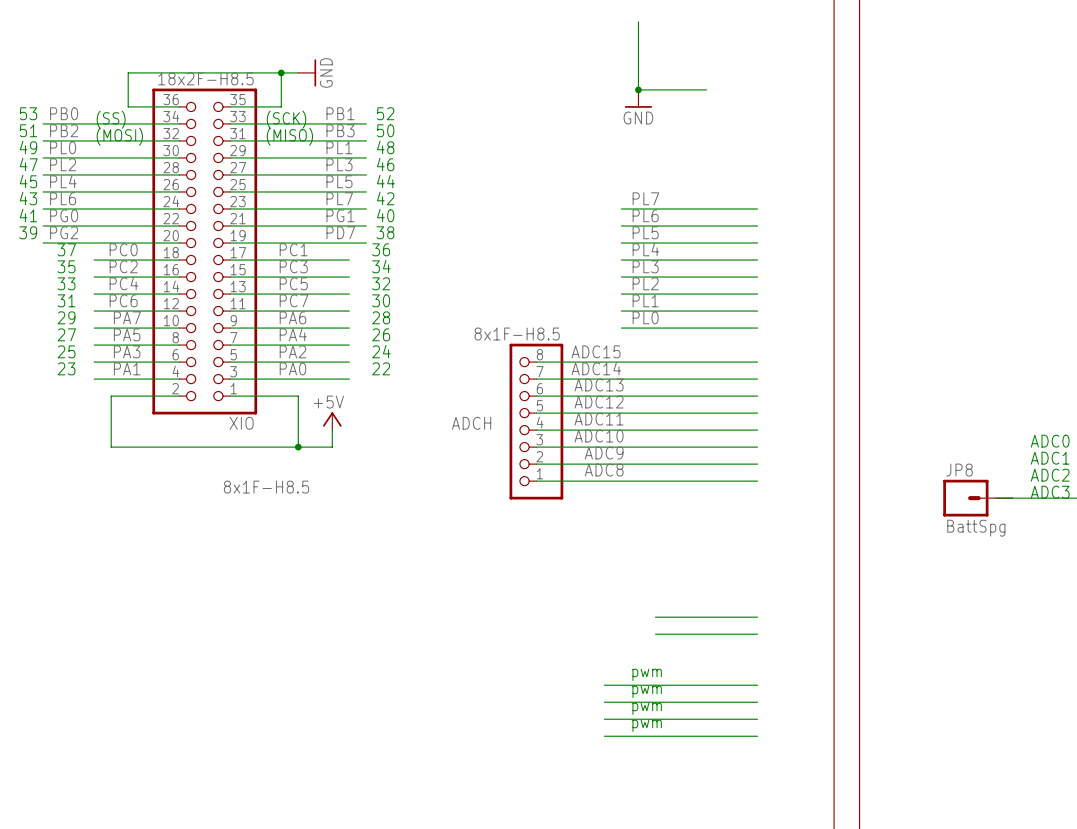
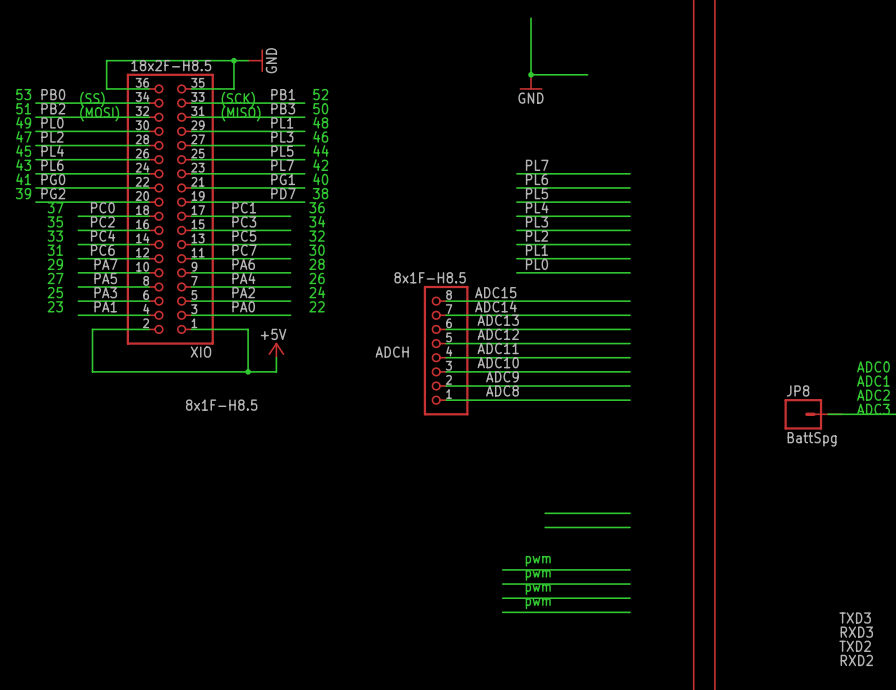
label: none -> TXD3 (855, 618)
label: none -> RXD3 (856, 632)
label: none -> TXD2 (855, 646)
label: none -> RXD2 (856, 660)

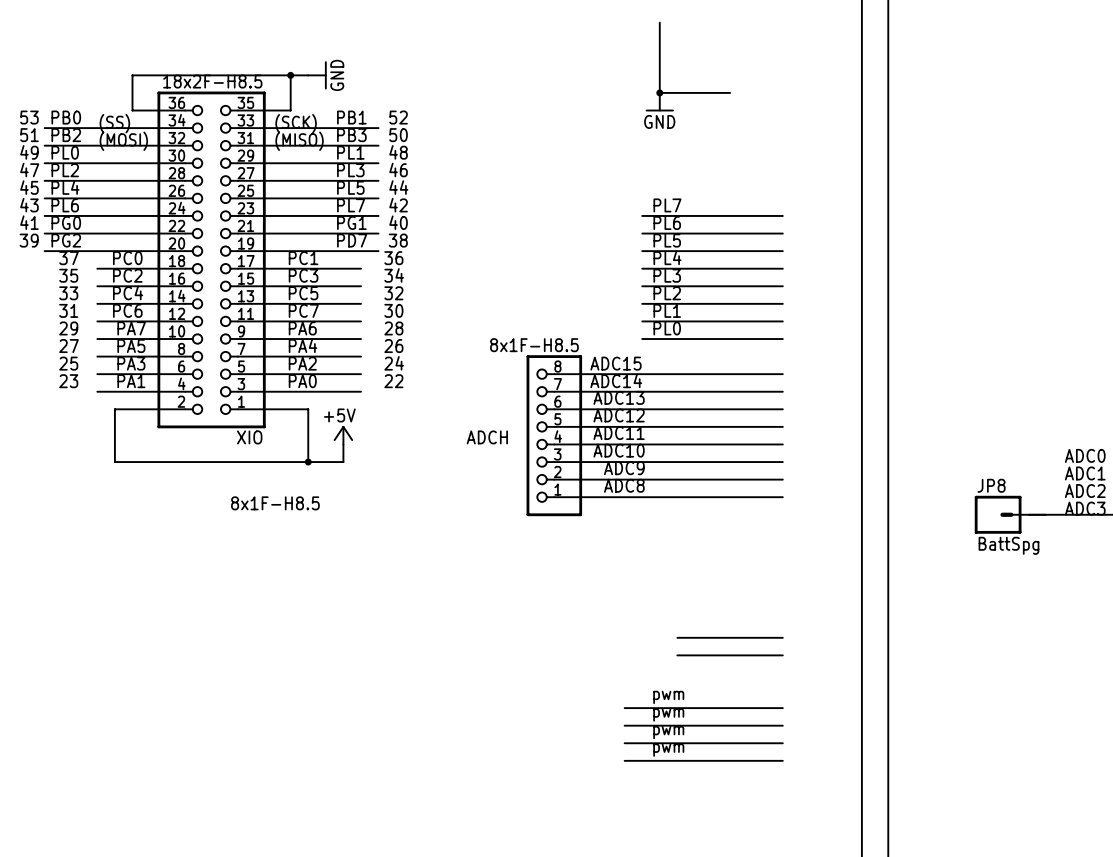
label: TXD3 (855, 618) -> none
label: RXD3 (856, 632) -> none
label: TXD2 (855, 646) -> none
label: RXD2 (856, 660) -> none

